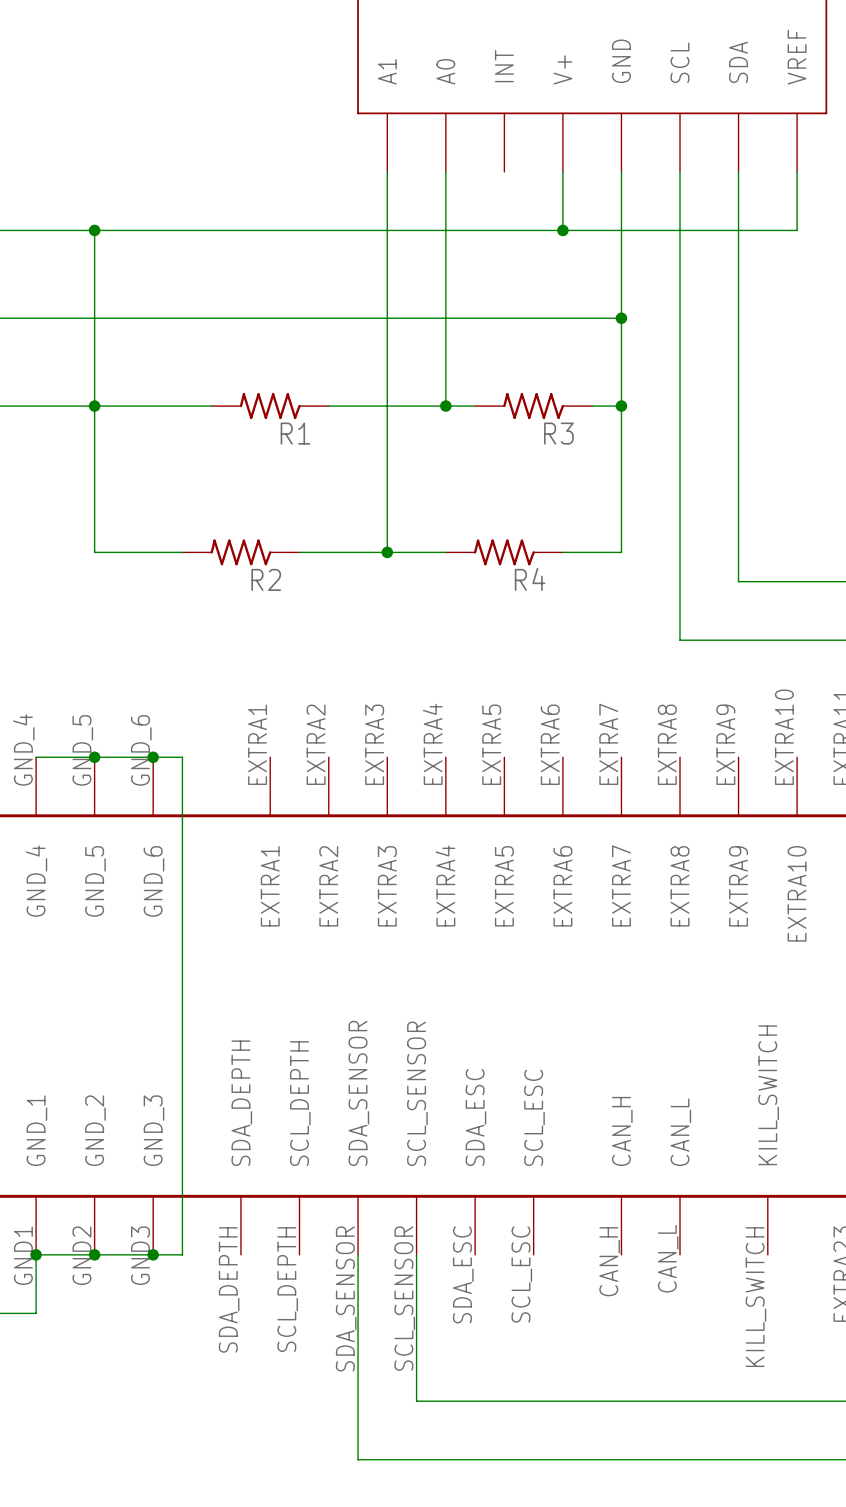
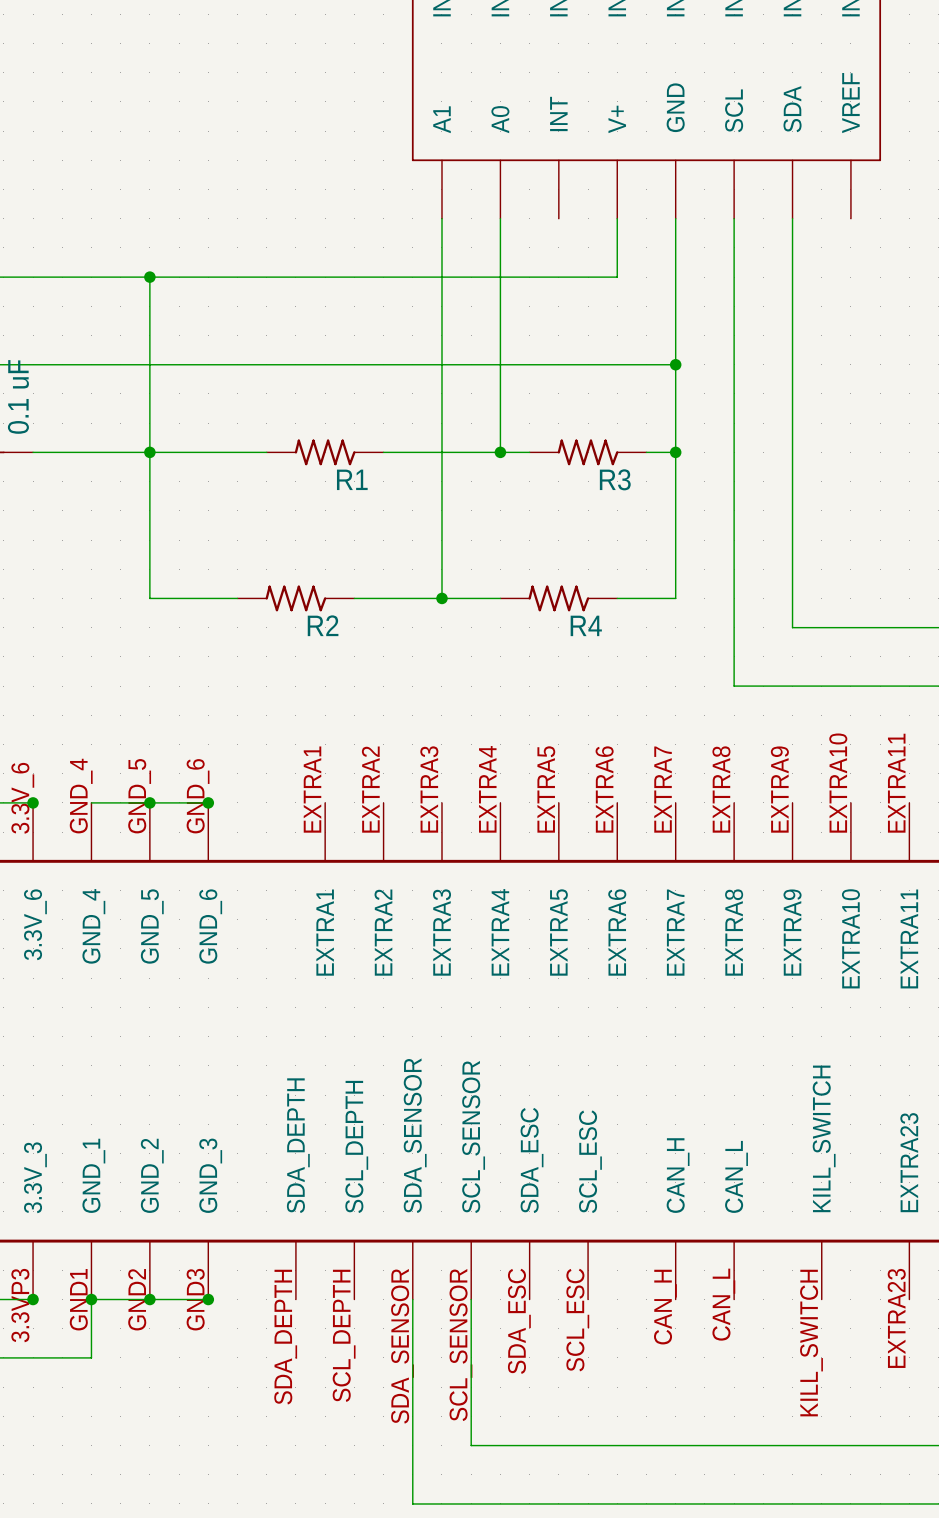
wire: (797, 171) (797, 230) (562, 230) -> none
junction: (562, 230) -> none
wire: (153, 757) (182, 757) (182, 1254) (153, 1254) -> none

